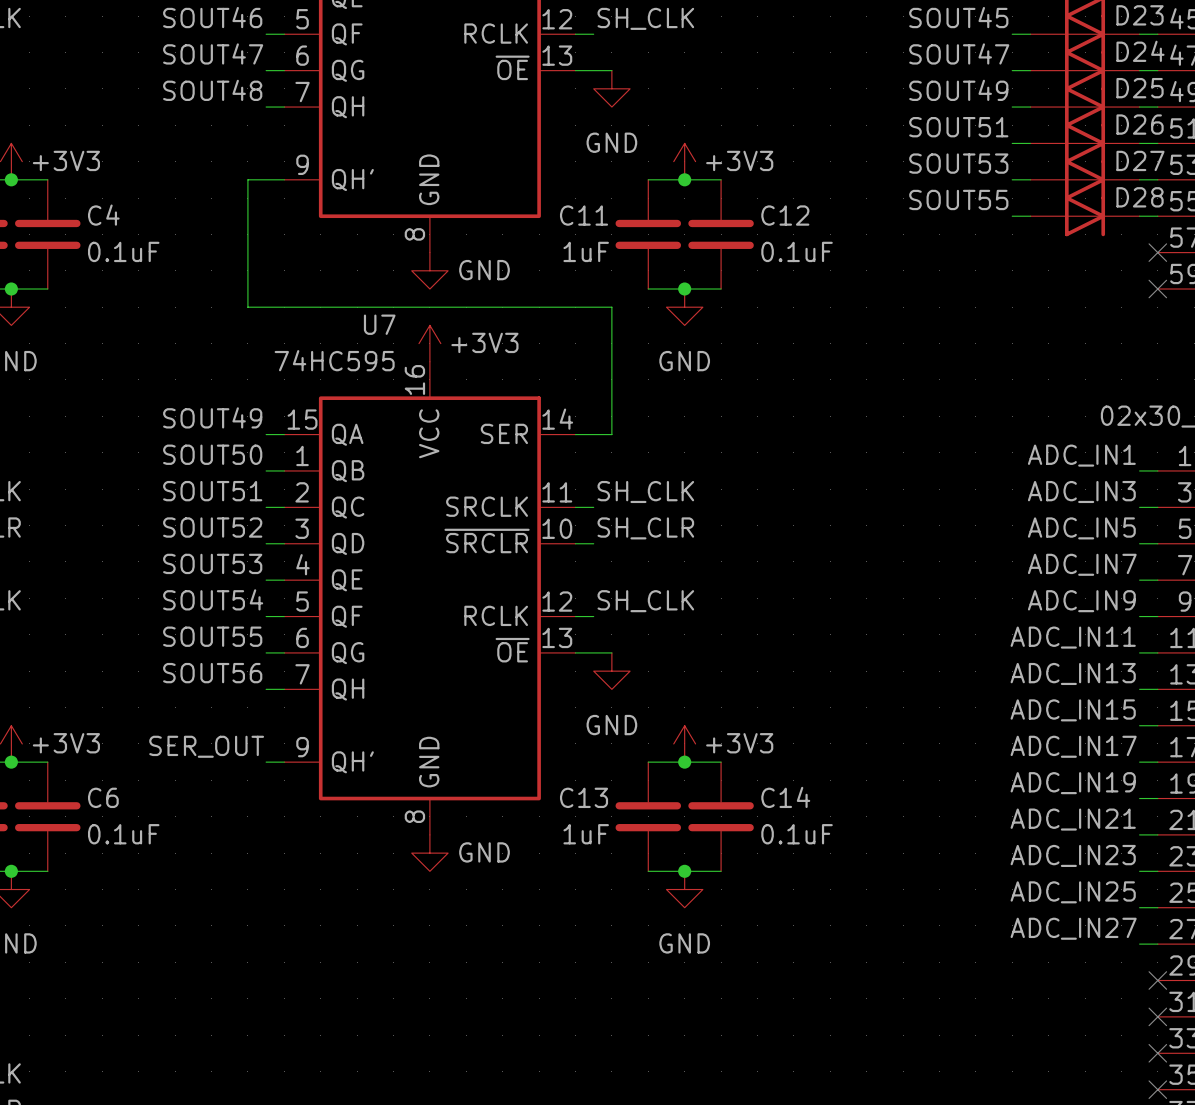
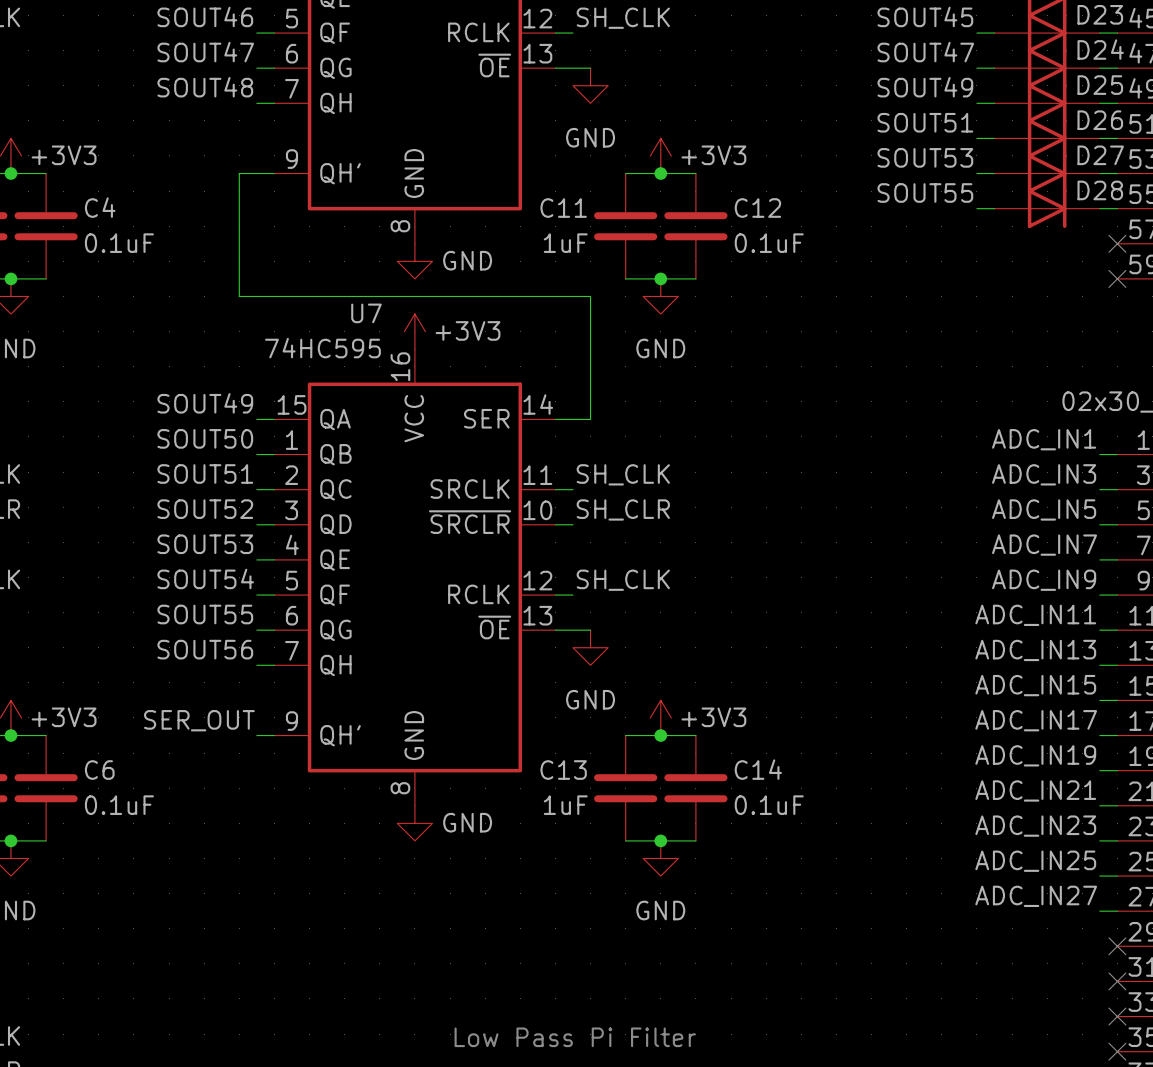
text: none -> Low Pass Pi Filter (575, 1037)

